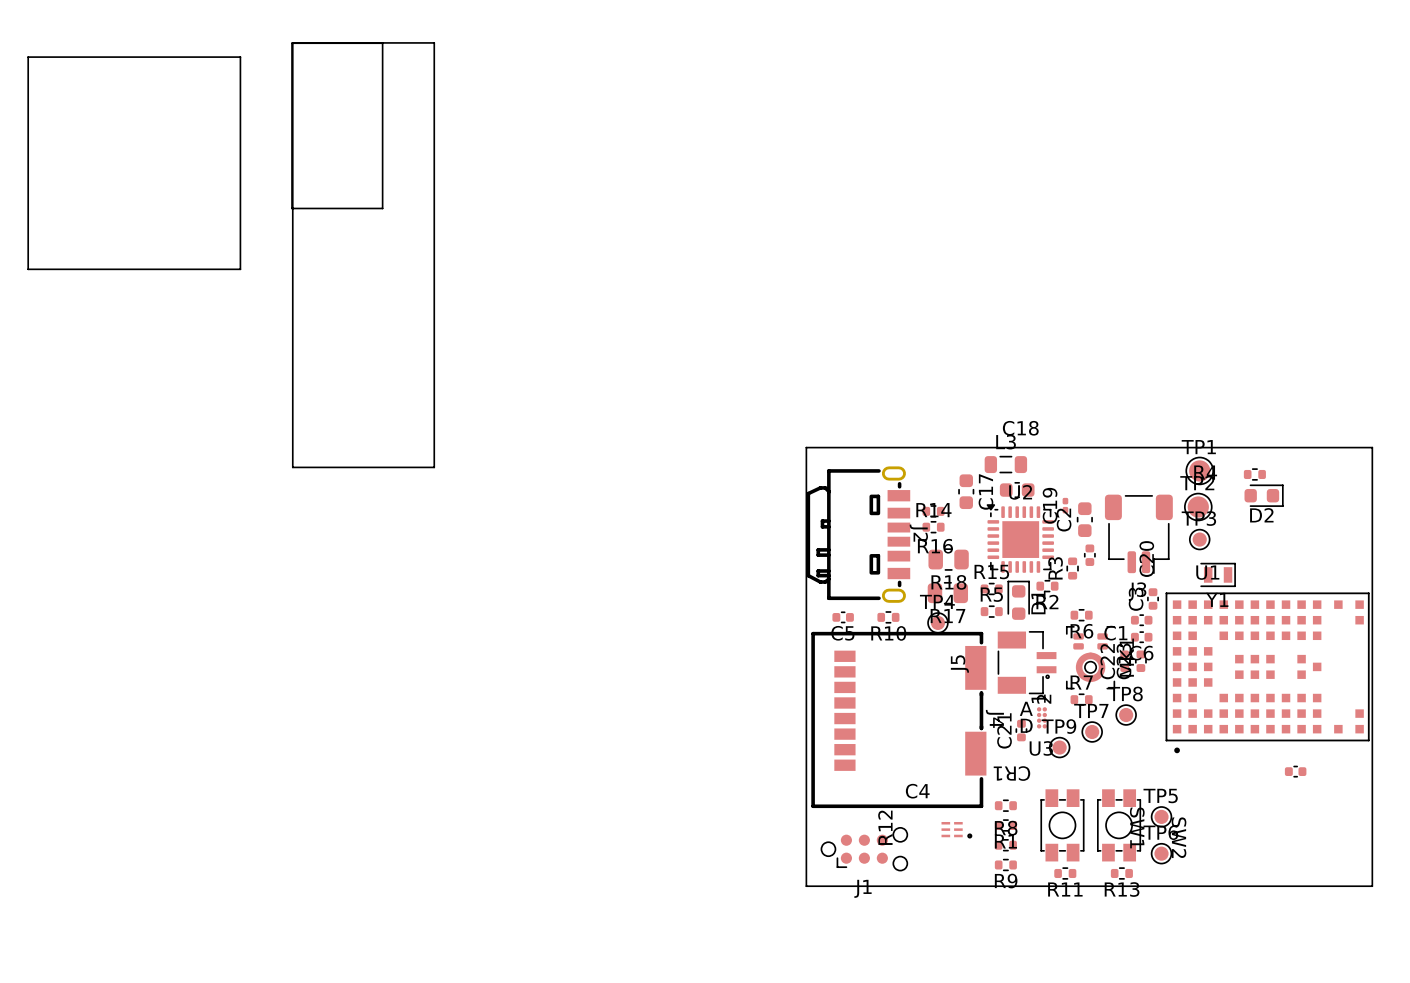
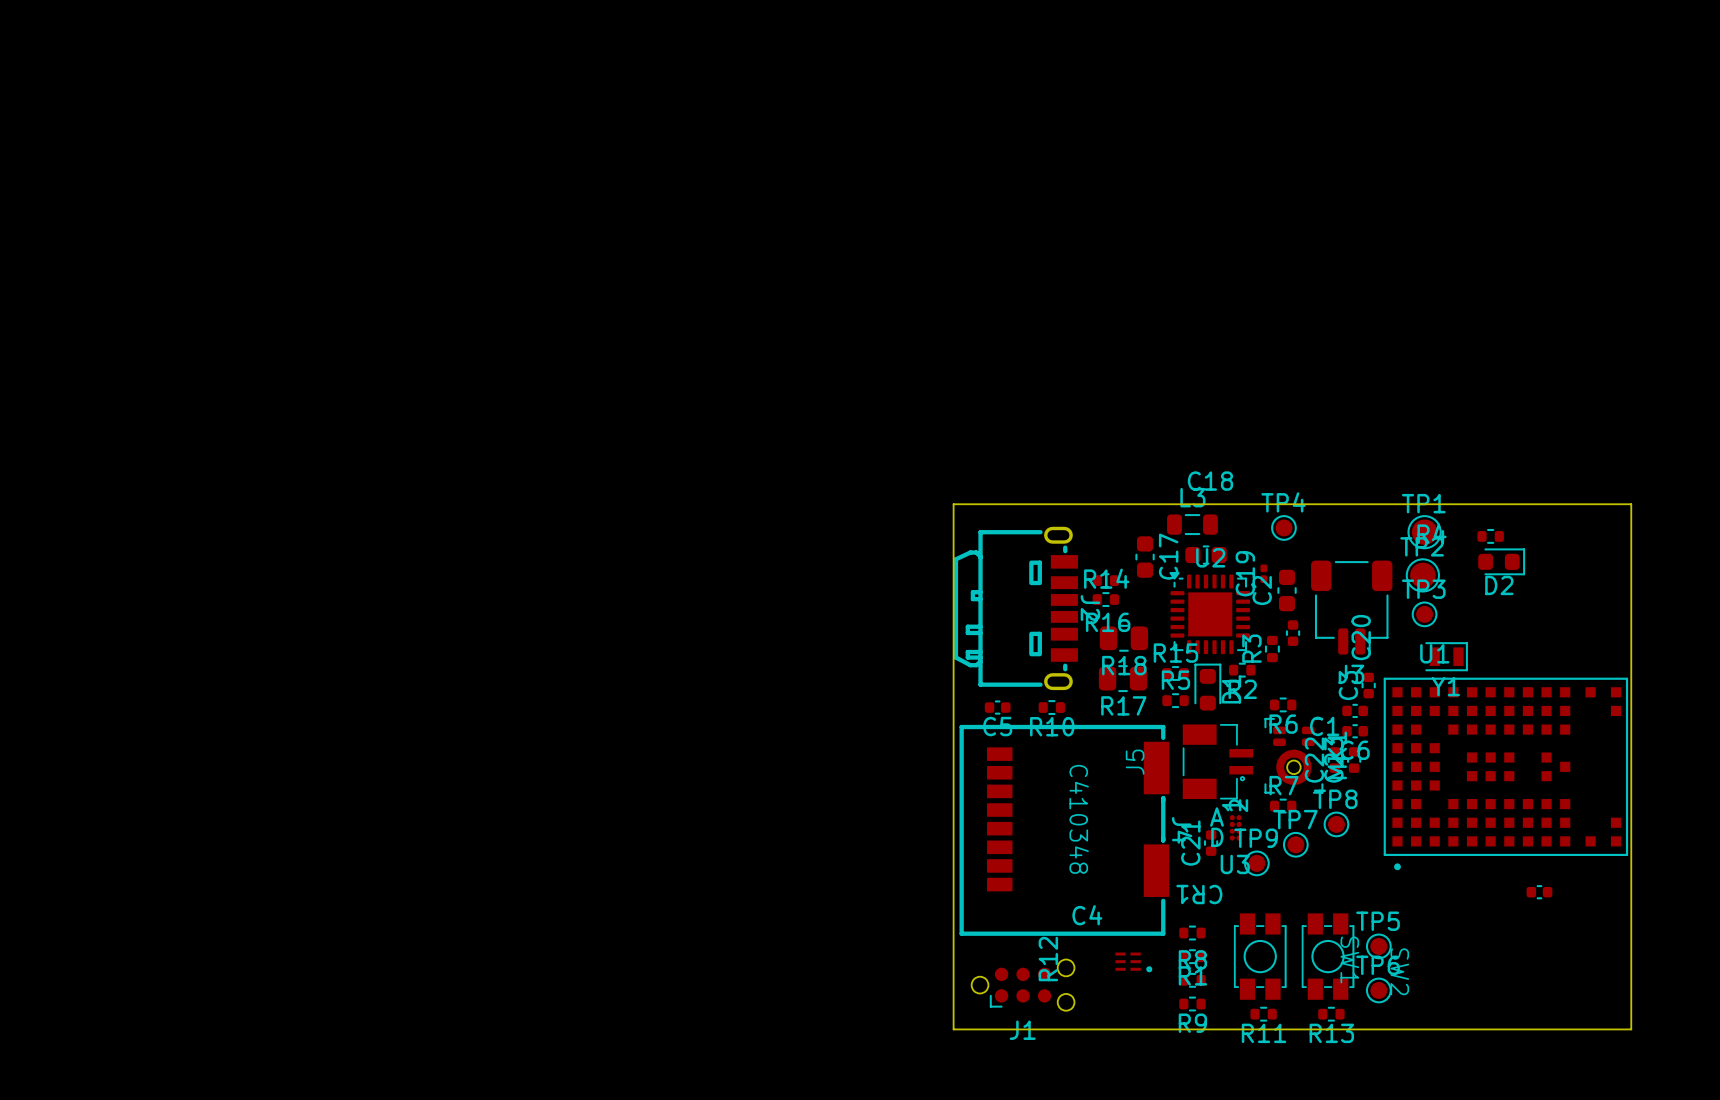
line: (292, 42) (434, 42) (434, 467) (292, 467) (292, 42) -> none
line: (292, 43) (382, 43) (382, 208) (292, 208) (292, 43) -> none
line: (28, 57) (240, 57) (240, 269) (28, 269) (28, 57) -> none
TP4 position: (937, 622) -> (1283, 527)
J4 text: none -> C410348 (1079, 819)

